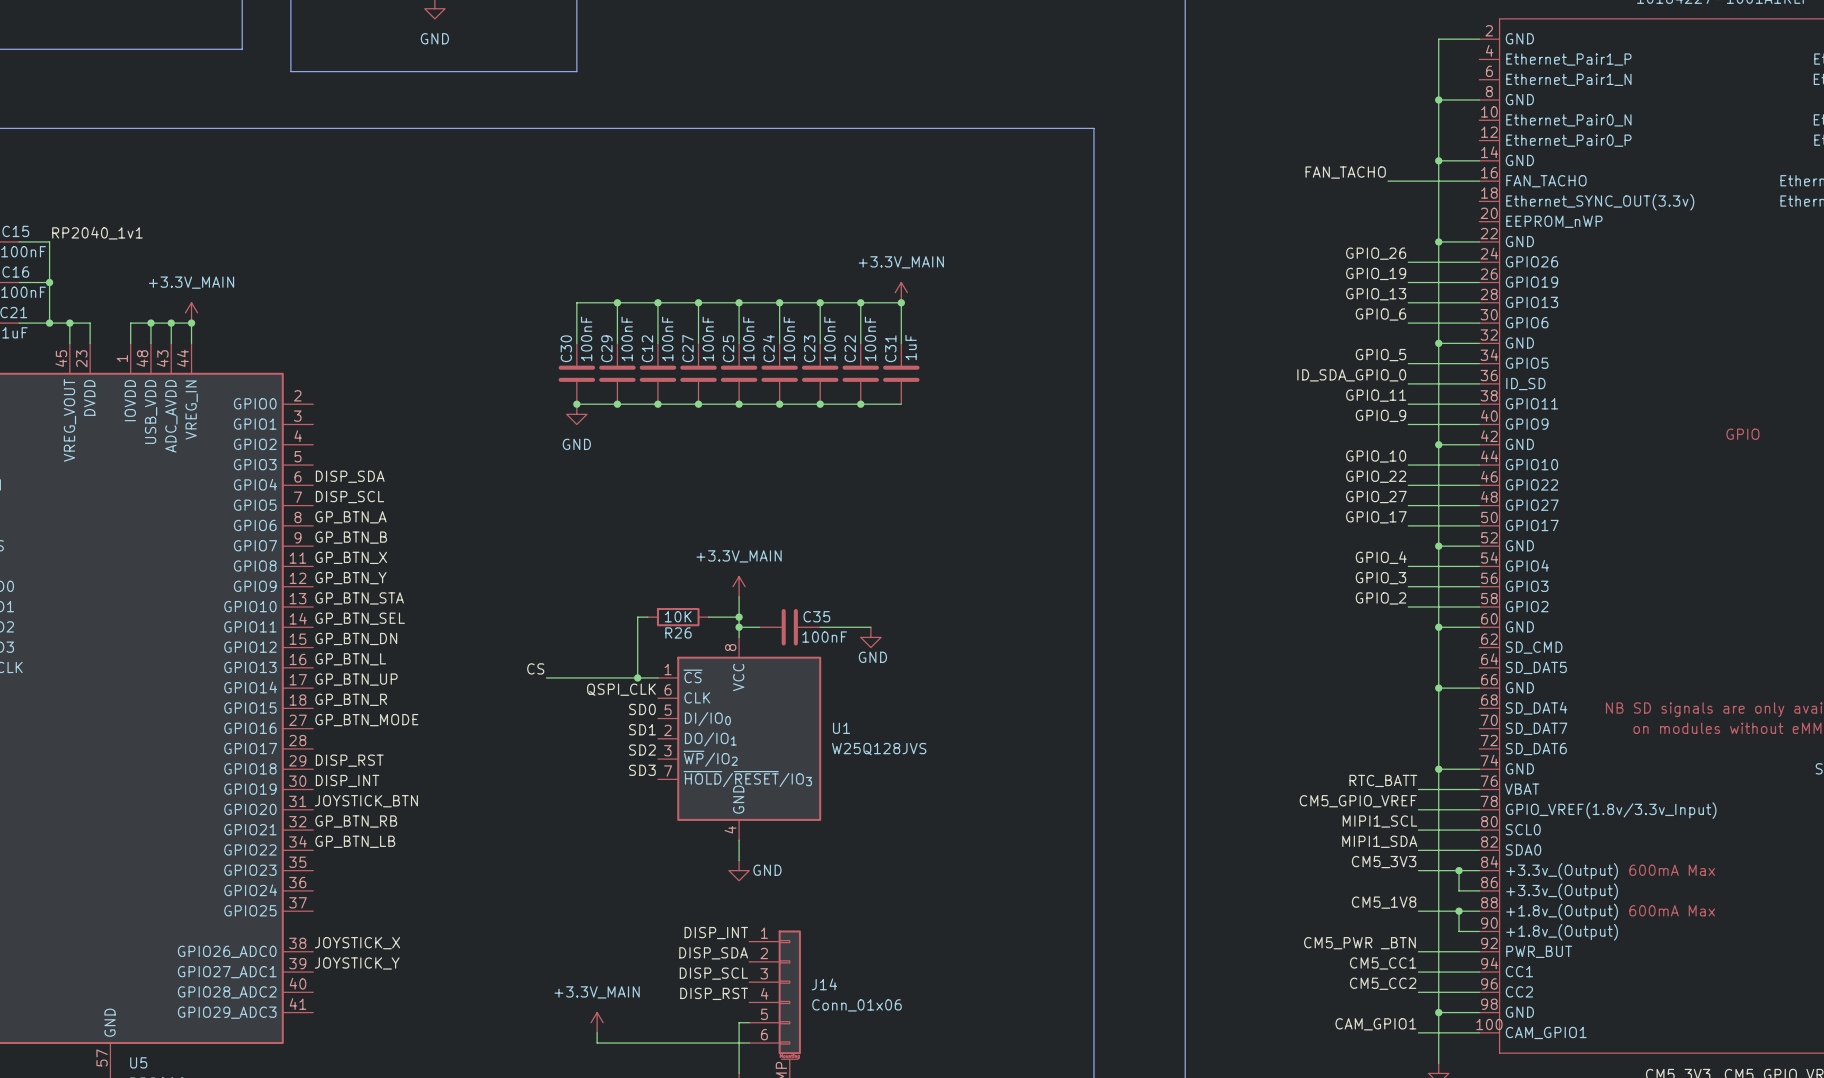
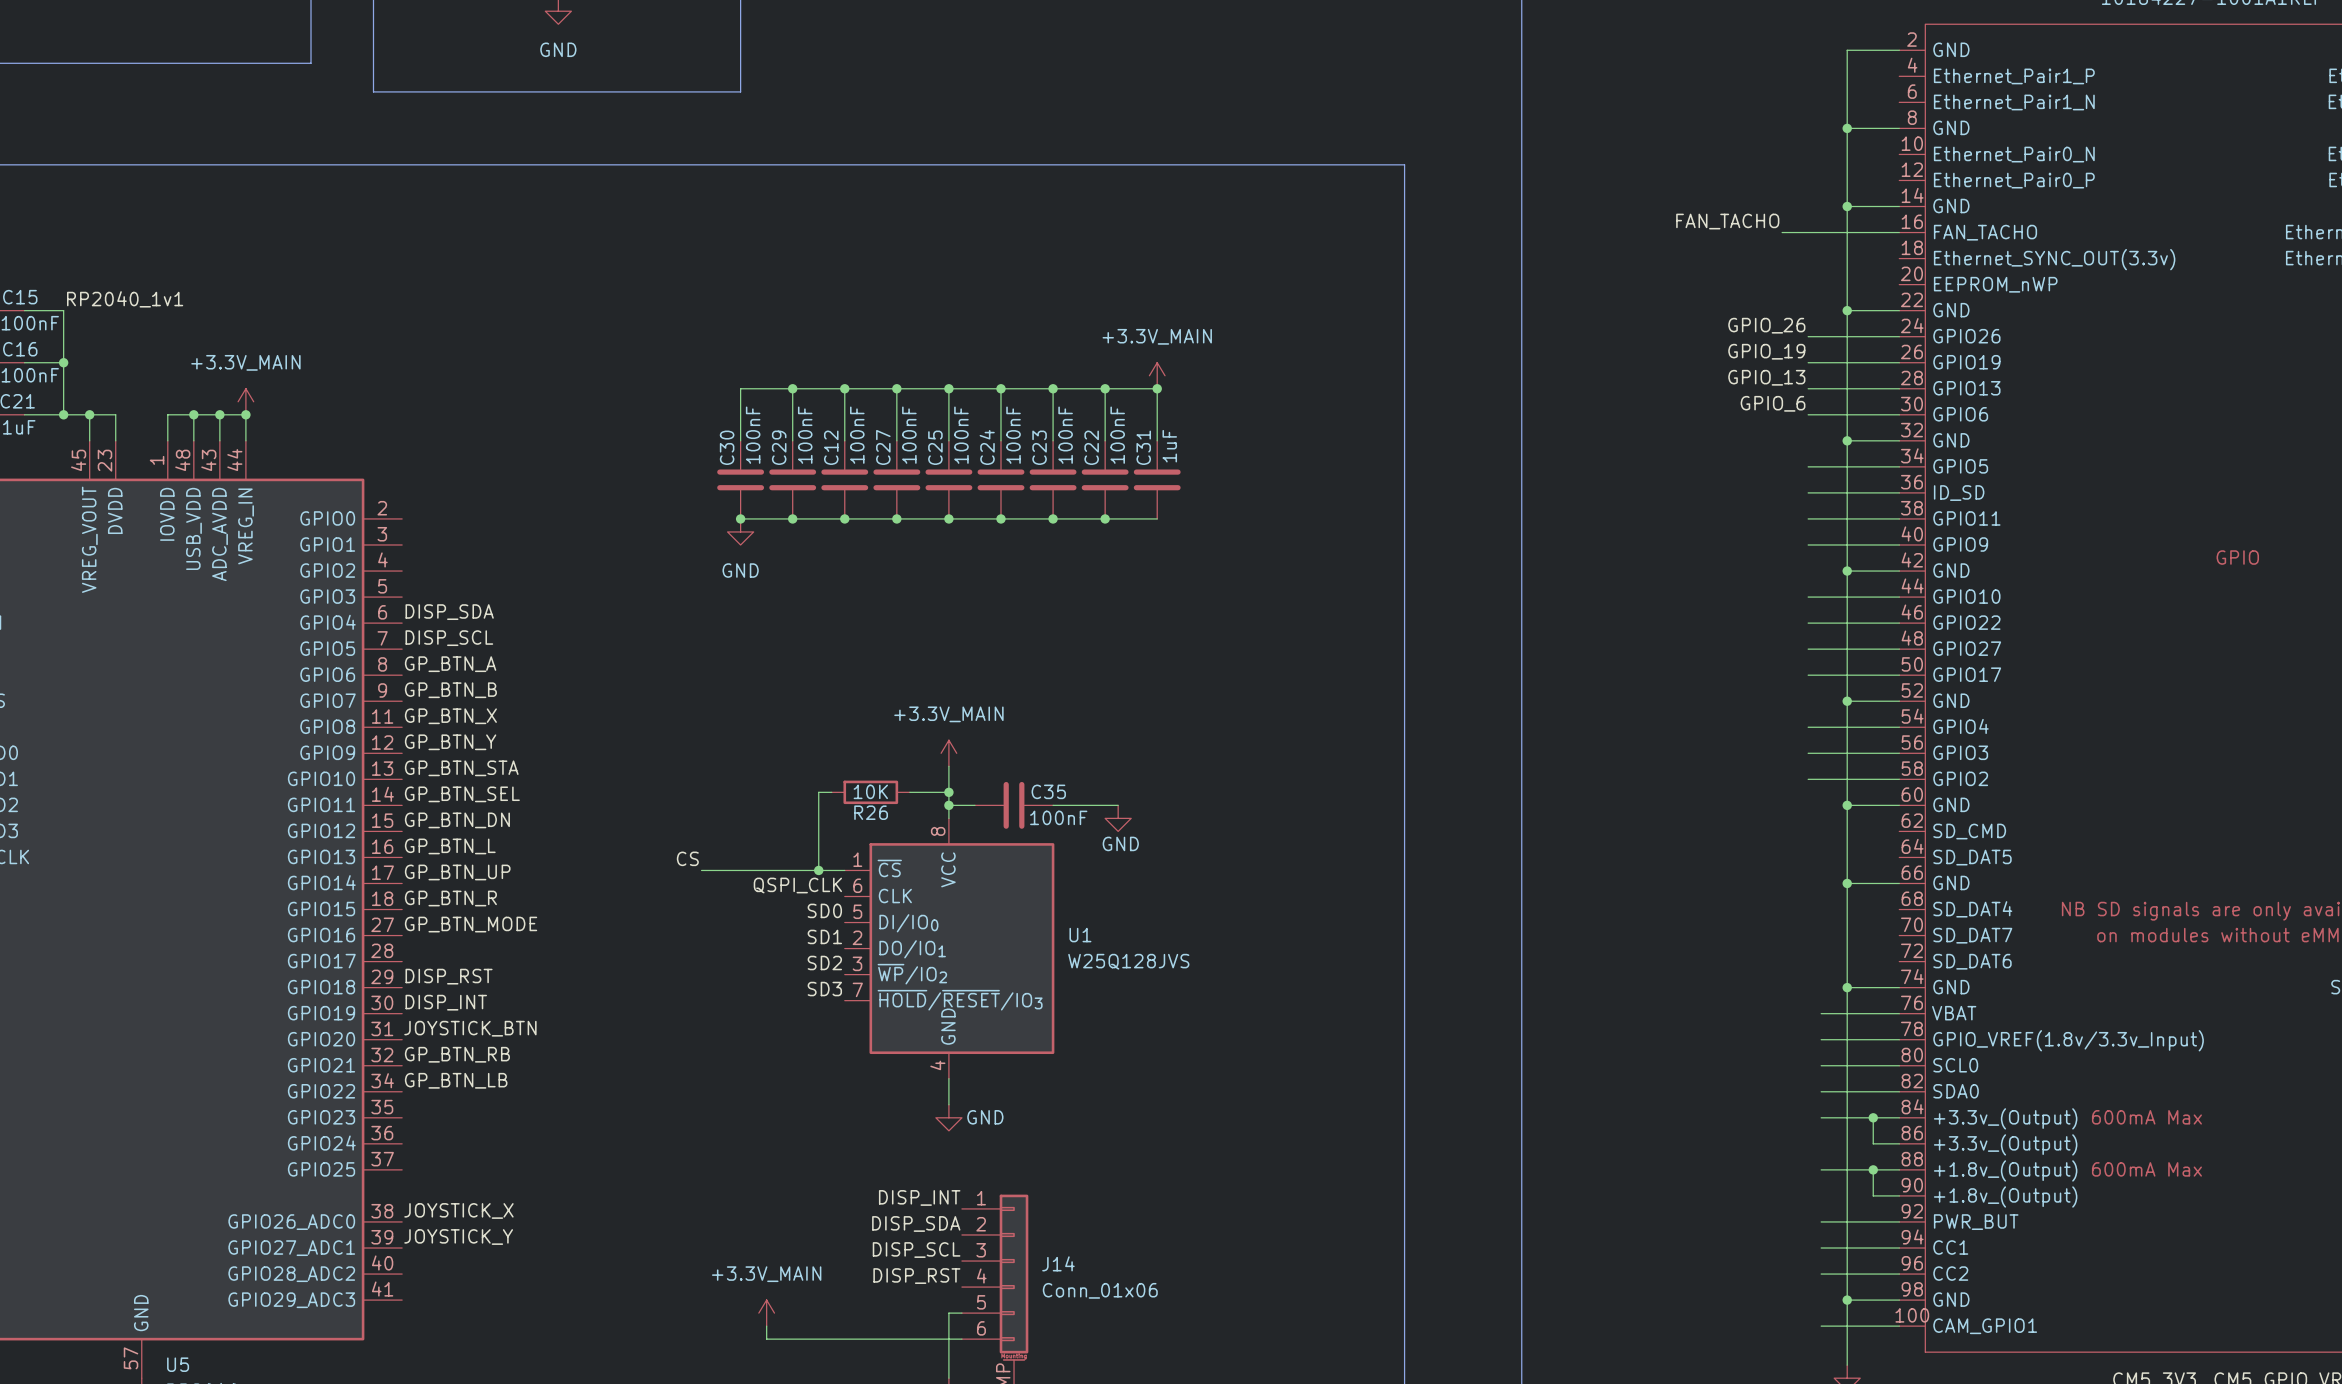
label: GPIO_5 (1380, 355) -> none
label: ID_SDA_GPIO_0 (1351, 375) -> none
label: GPIO_11 (1376, 395) -> none
label: GPIO_9 (1380, 415) -> none
label: GPIO_10 (1376, 456) -> none
label: GPIO_22 (1376, 476) -> none
label: GPIO_27 (1376, 497) -> none
label: GPIO_17 (1376, 517) -> none
label: GPIO_4 (1381, 557) -> none
label: GPIO_3 (1380, 578) -> none
label: GPIO_2 (1380, 598) -> none
label: RTC_BATT (1383, 780) -> none
label: CM5_GPIO_VREF (1358, 801) -> none
label: MIPI1_SCL (1379, 821) -> none
label: MIPI1_SDA (1379, 841) -> none
label: CM5_3V3 (1384, 862) -> none
label: CM5_1V8 (1384, 902) -> none
label: CM5_PWR _BTN (1359, 943) -> none
label: CM5_CC1 (1383, 963) -> none
label: CM5_CC2 (1383, 983) -> none
label: CAM_GPIO1 (1375, 1024) -> none

